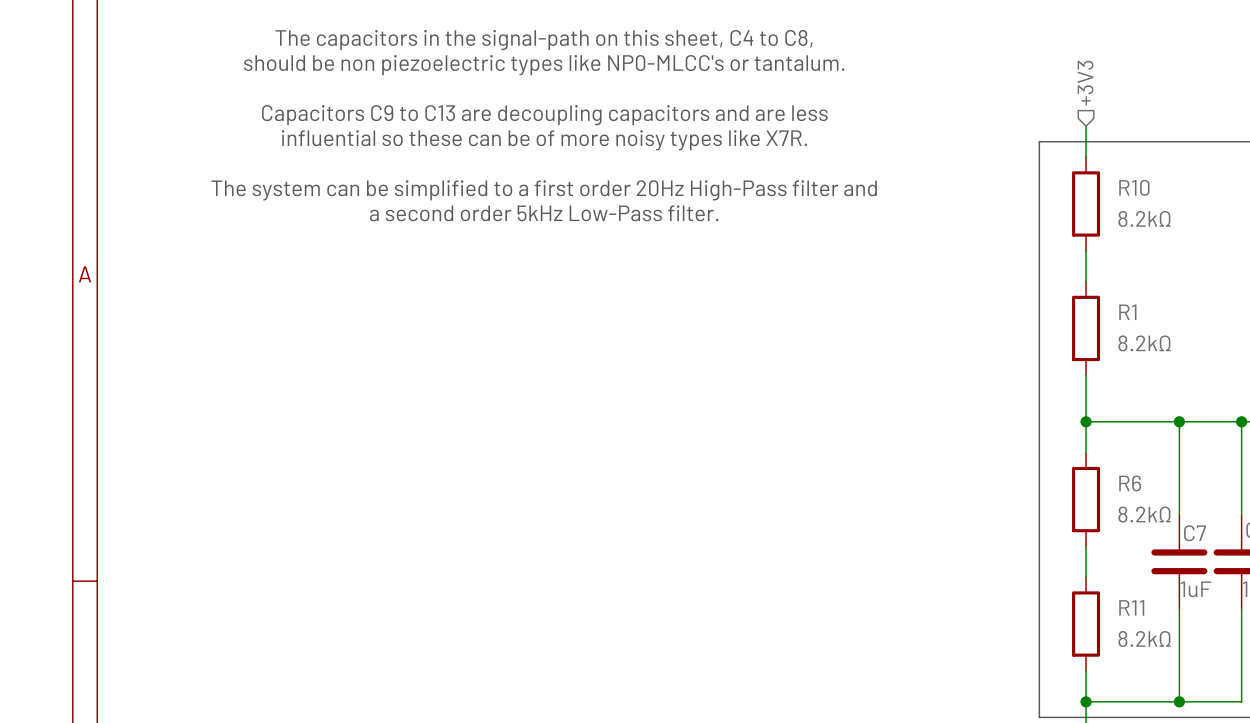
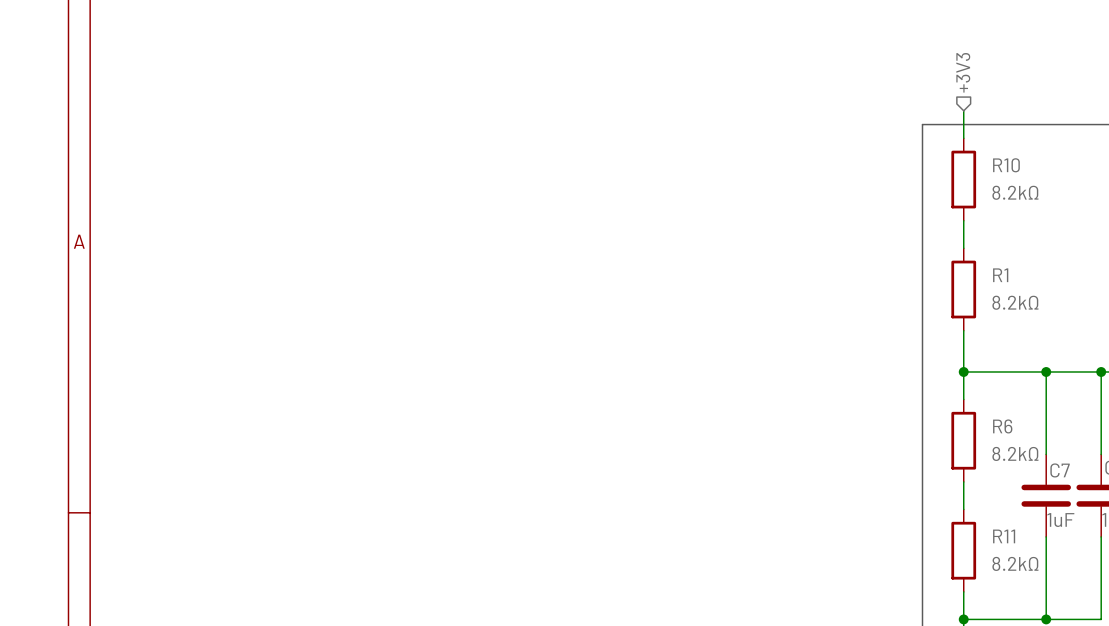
text: The capacitors in the signal-path on this sheet, C4 to C8, (544, 40) -> none
text: should be non piezoelectric types like NP0-MLCC's or tantalum. (544, 65) -> none
text: Capacitors C9 to C13 are decoupling capacitors and are less (544, 115) -> none
text: influential so these can be of more noisy types like X7R. (544, 140) -> none
text: The system can be simplified to a first order 20Hz High-Pass filter and (544, 190) -> none
text: a second order 5kHz Low-Pass filter. (544, 213) -> none

